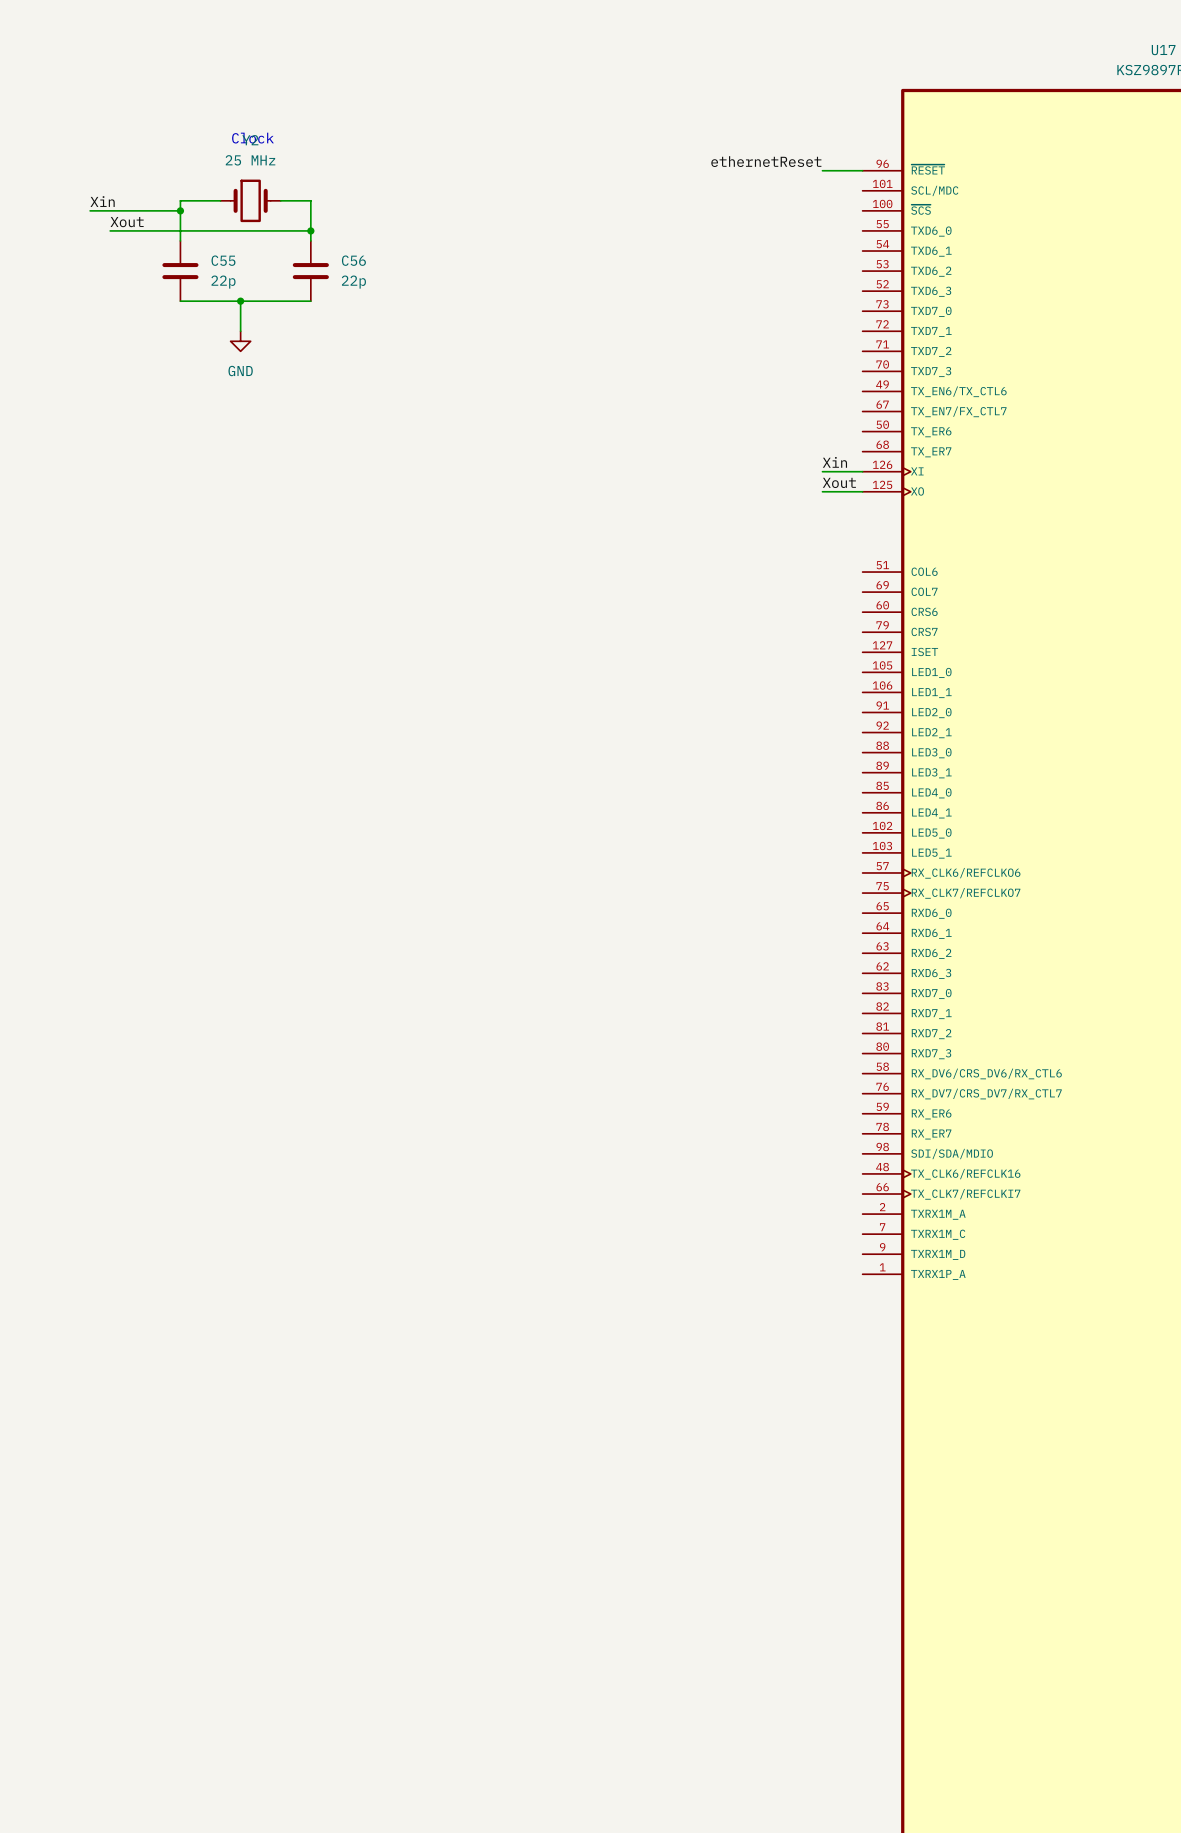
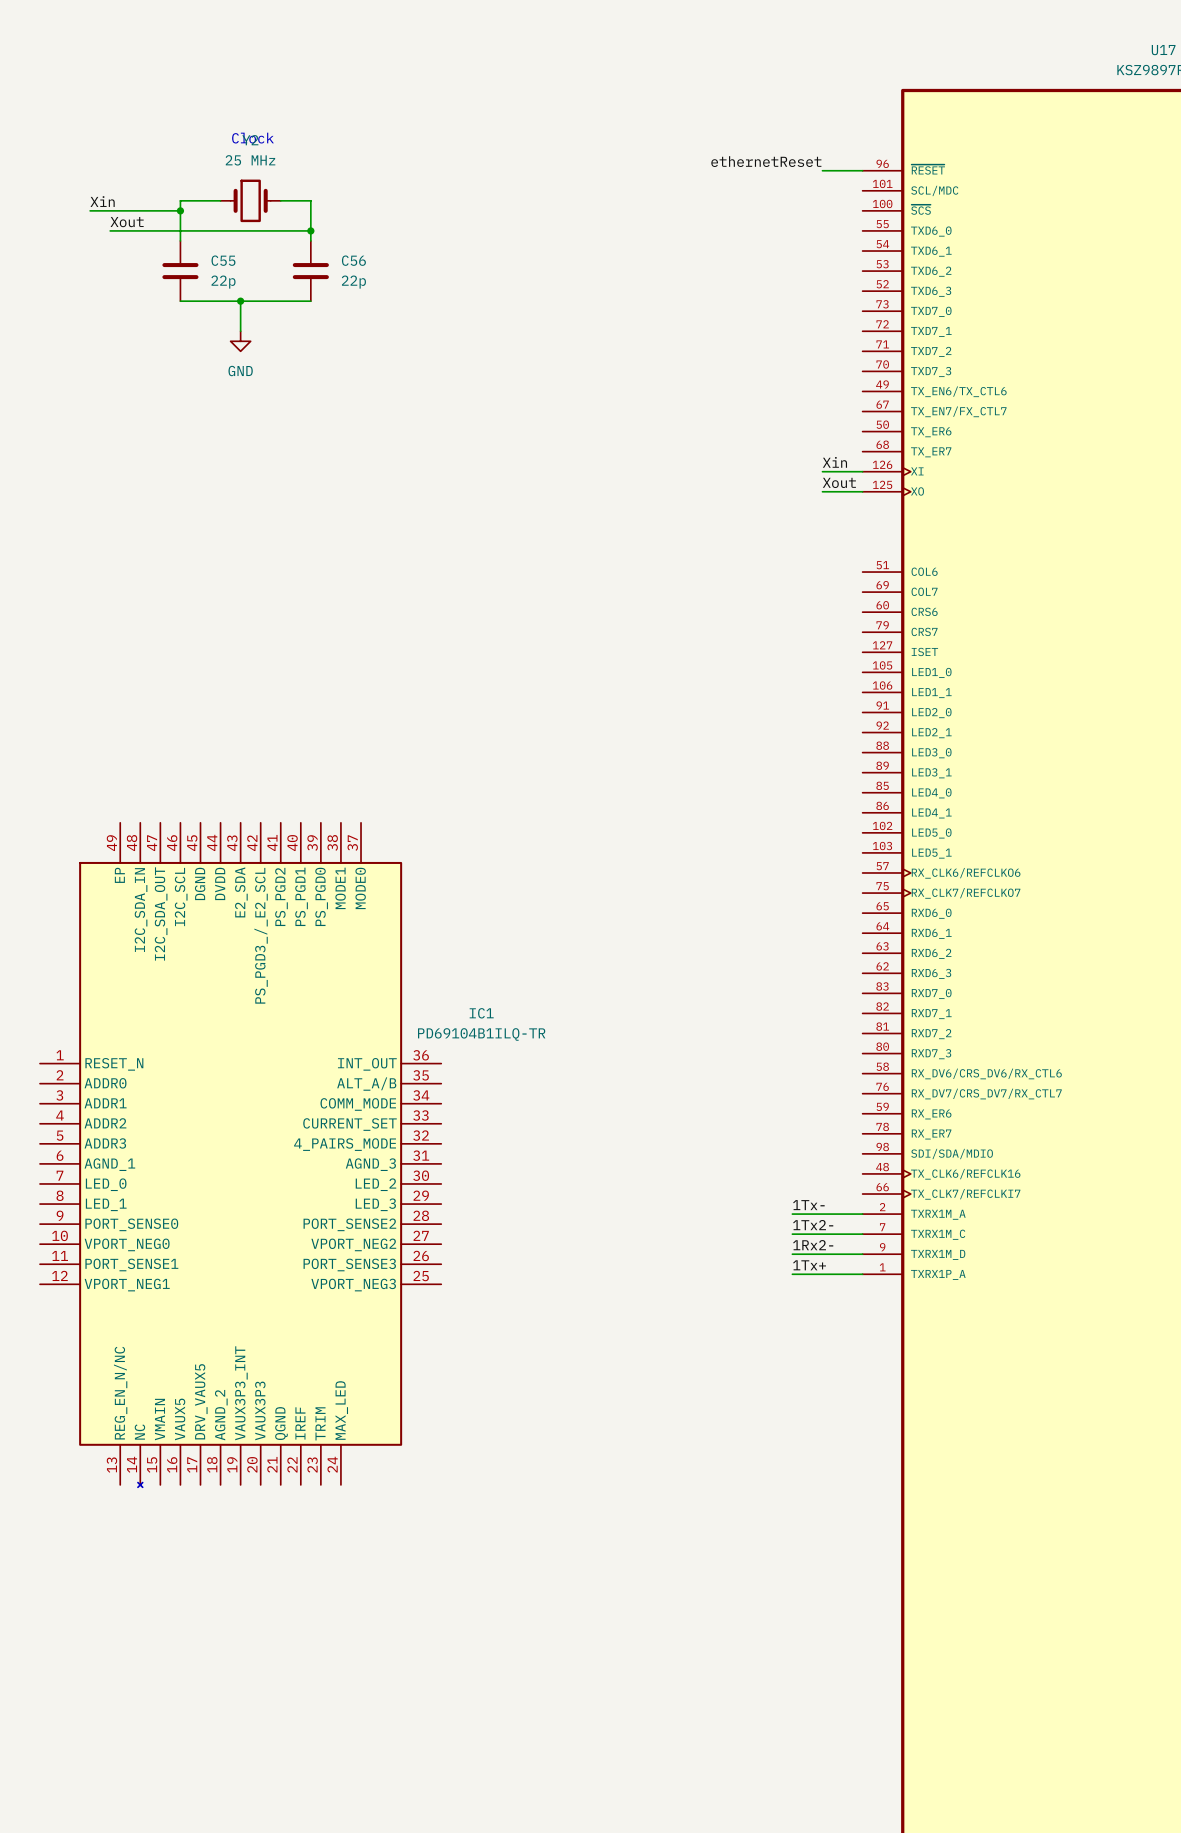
IC1: none -> PD69104B1ILQ-TR (240, 1155)
label: none -> 1Tx- (808, 1205)
wire: none -> (792, 1214) (862, 1214)
label: none -> 1Tx2- (813, 1225)
wire: none -> (792, 1234) (862, 1234)
label: none -> 1Rx2- (813, 1245)
wire: none -> (792, 1254) (862, 1254)
label: none -> 1Tx+ (809, 1265)
wire: none -> (792, 1274) (862, 1274)

